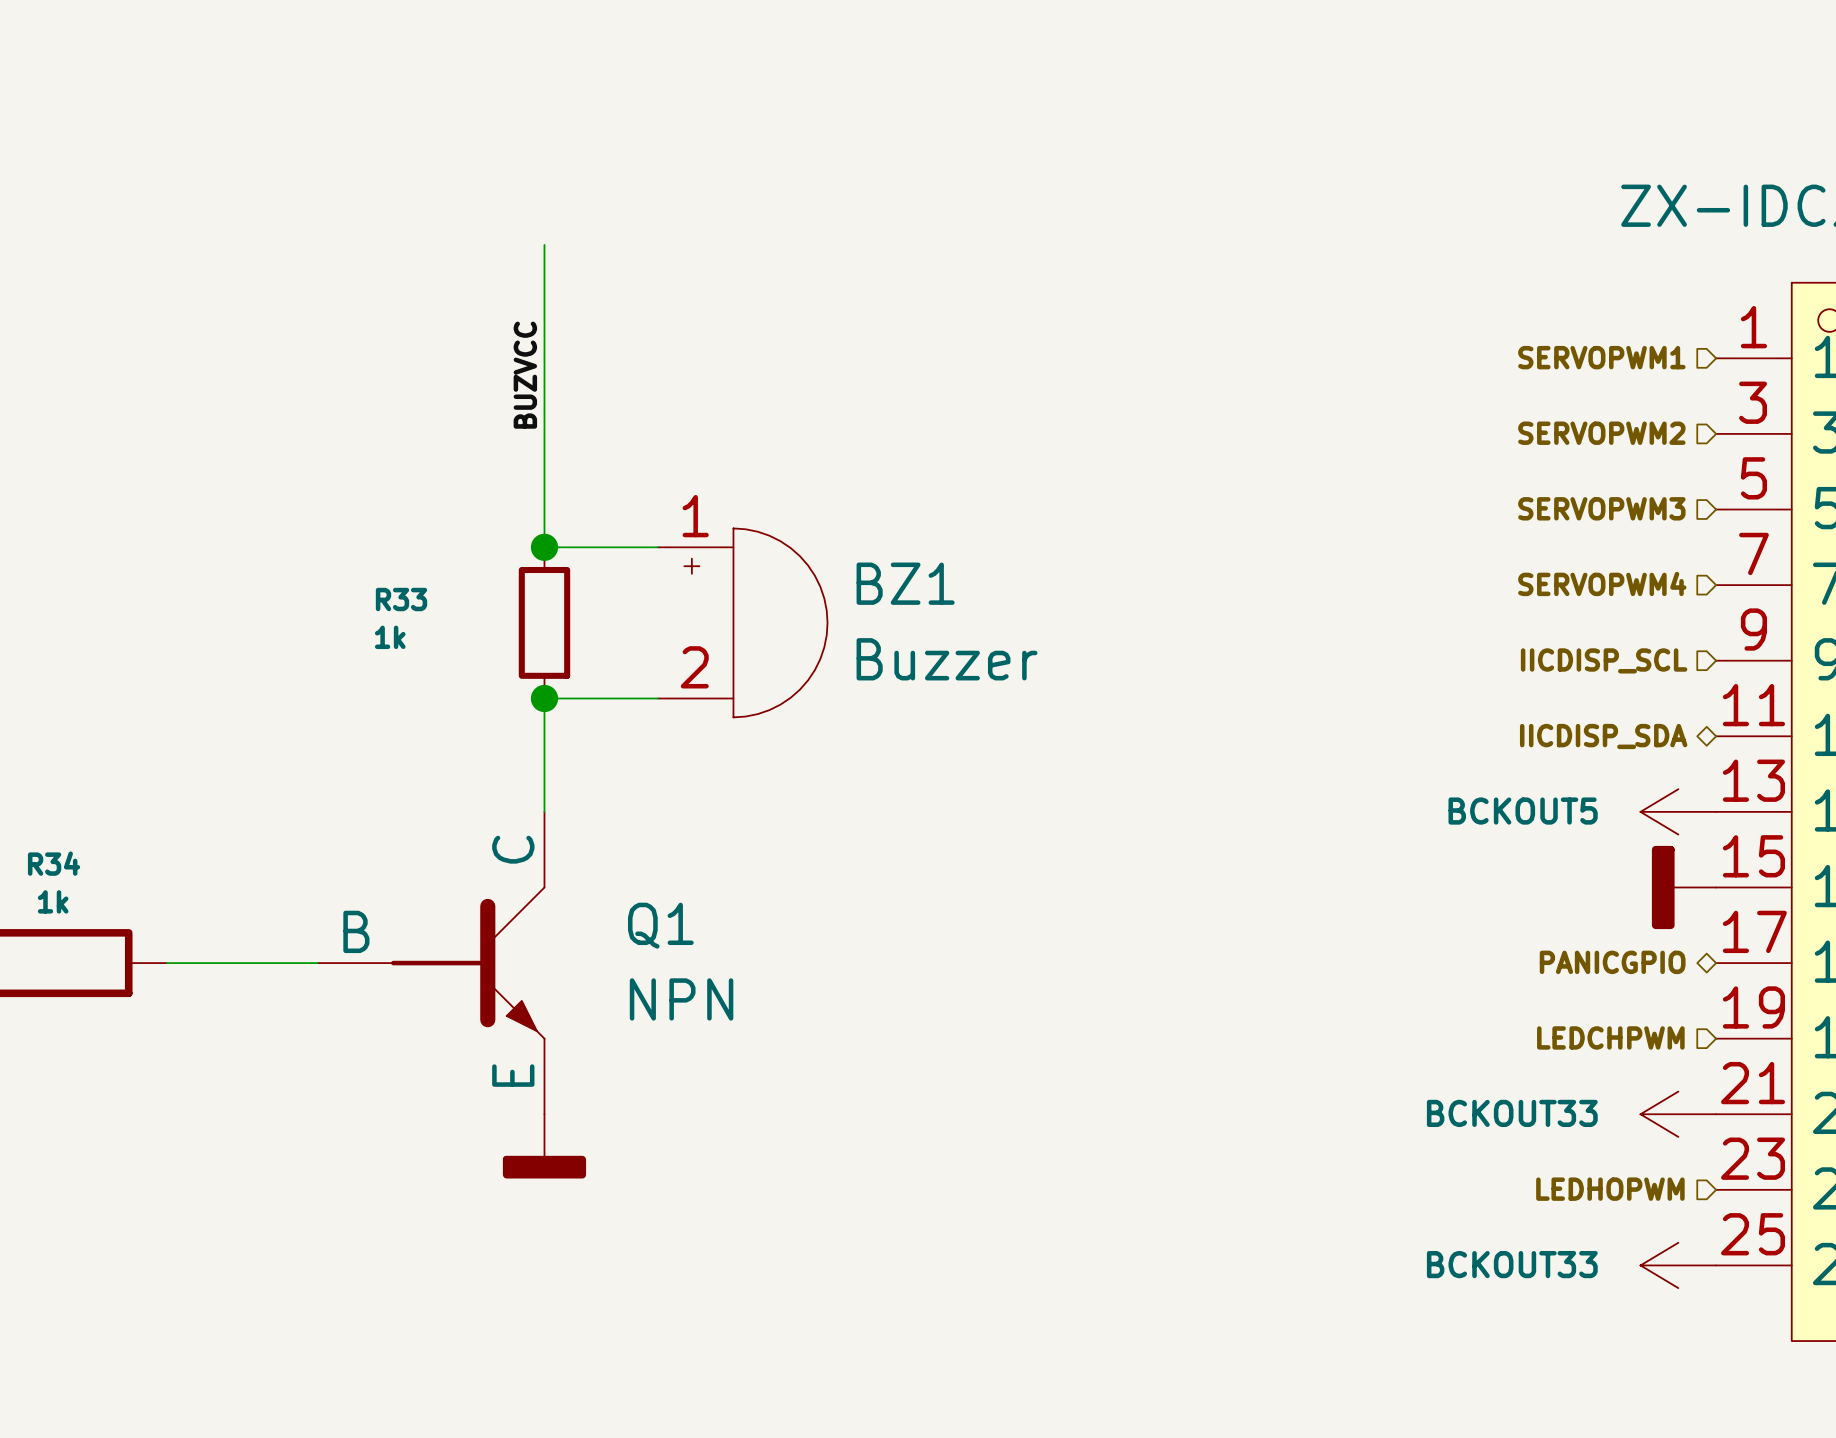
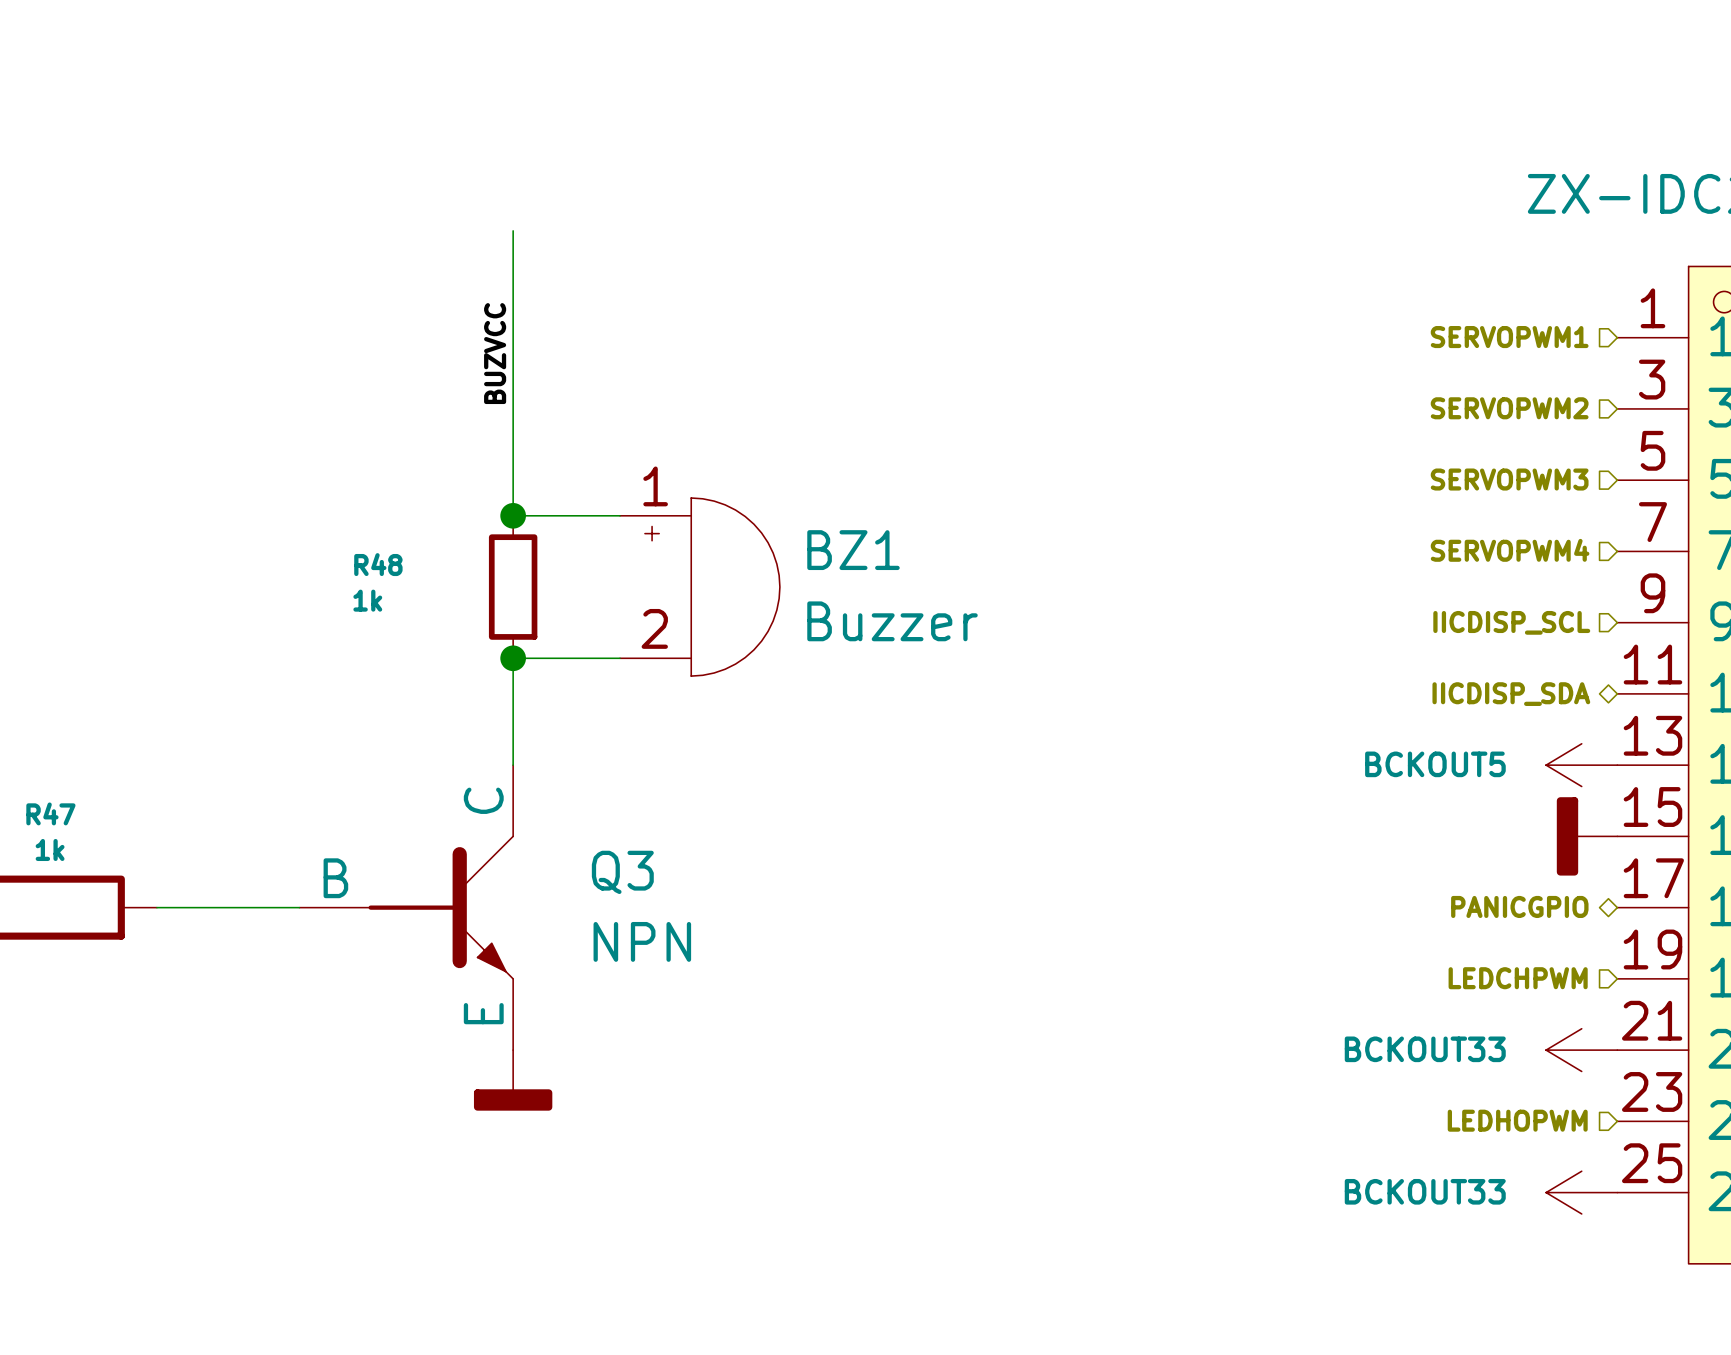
R33 name: R33 (401, 599) -> R48 (378, 564)
R34 name: R34 (54, 863) -> R47 (50, 813)
Q1 name: Q1 (660, 925) -> Q3 (622, 872)

